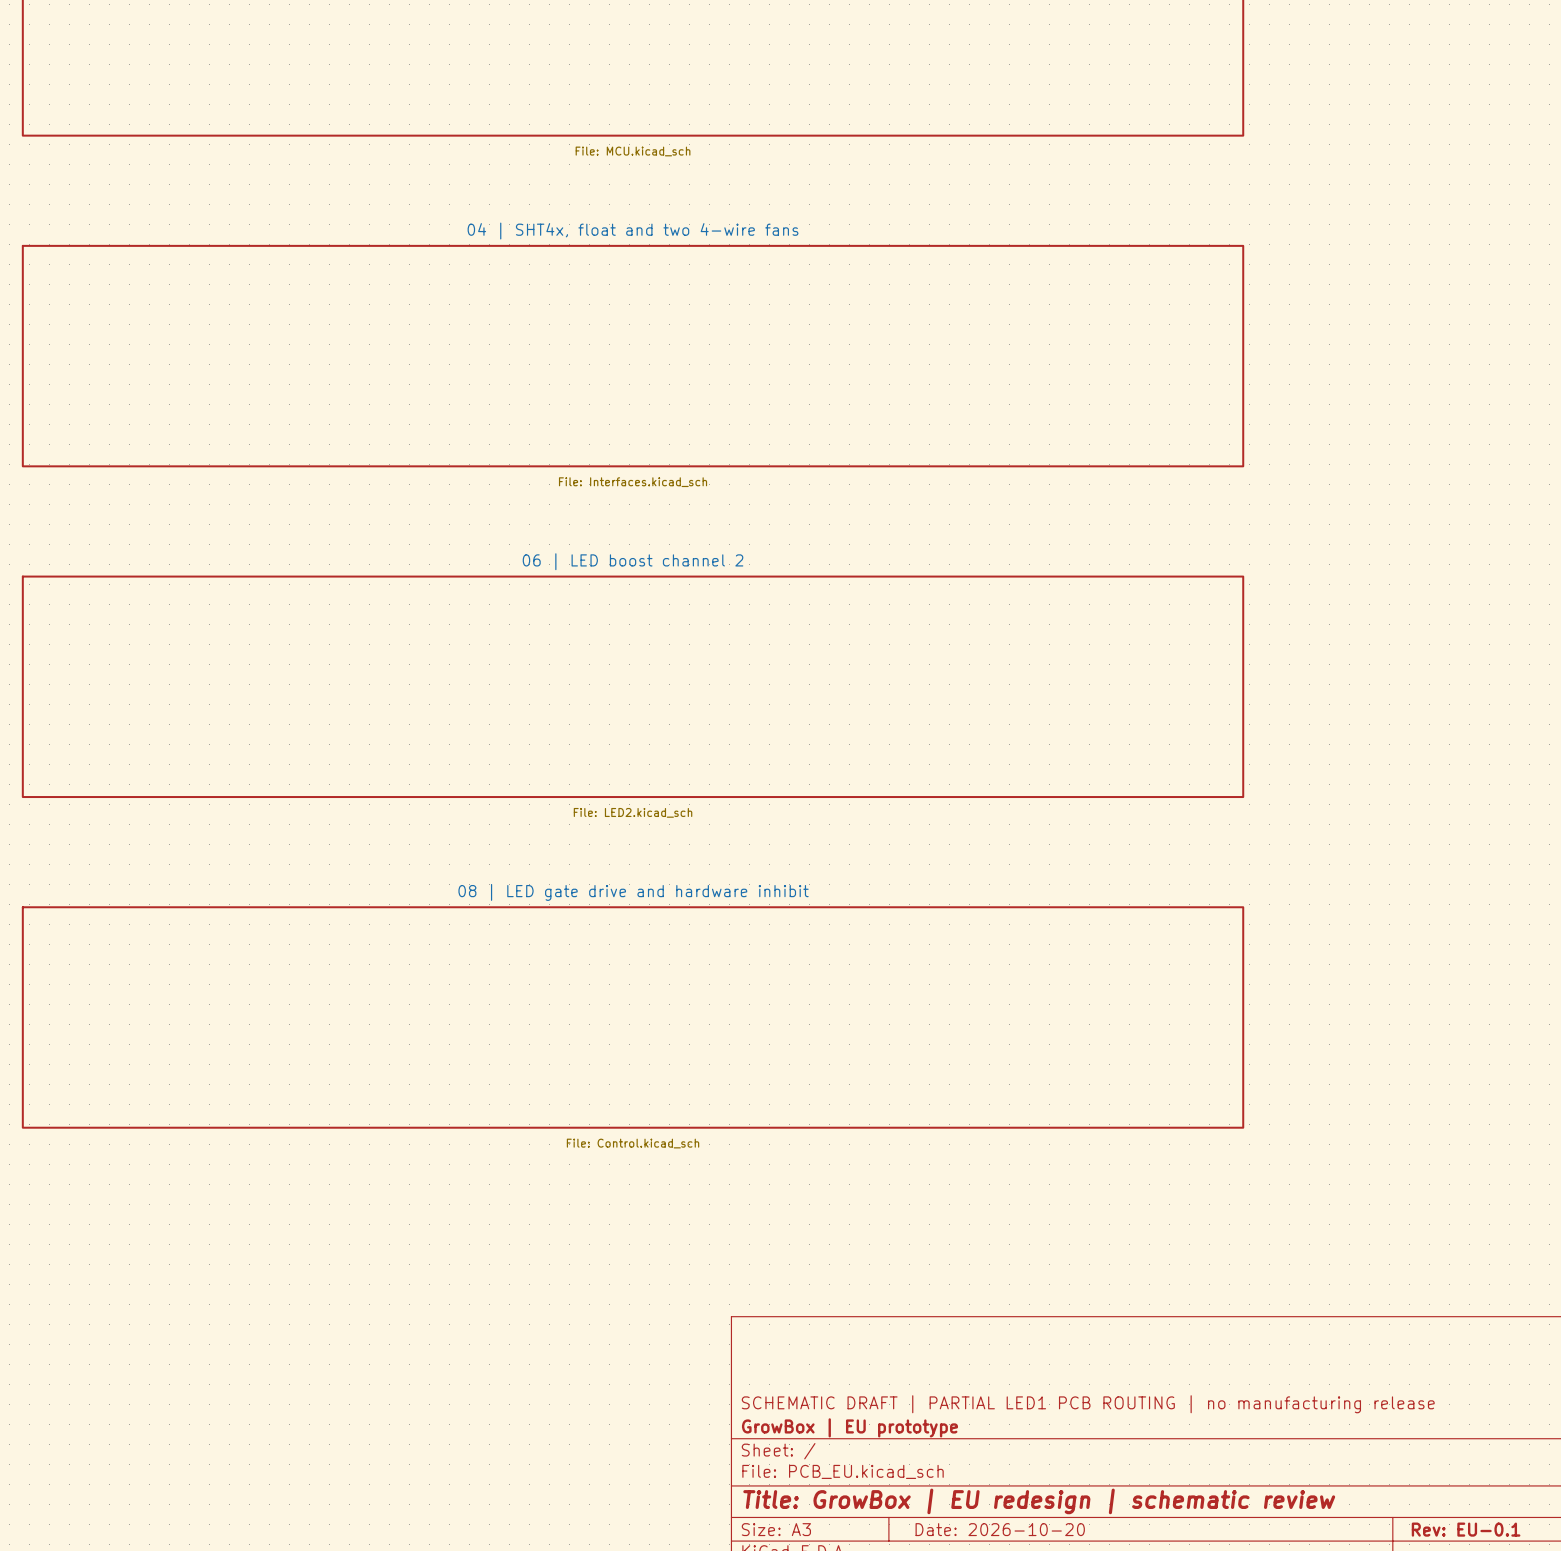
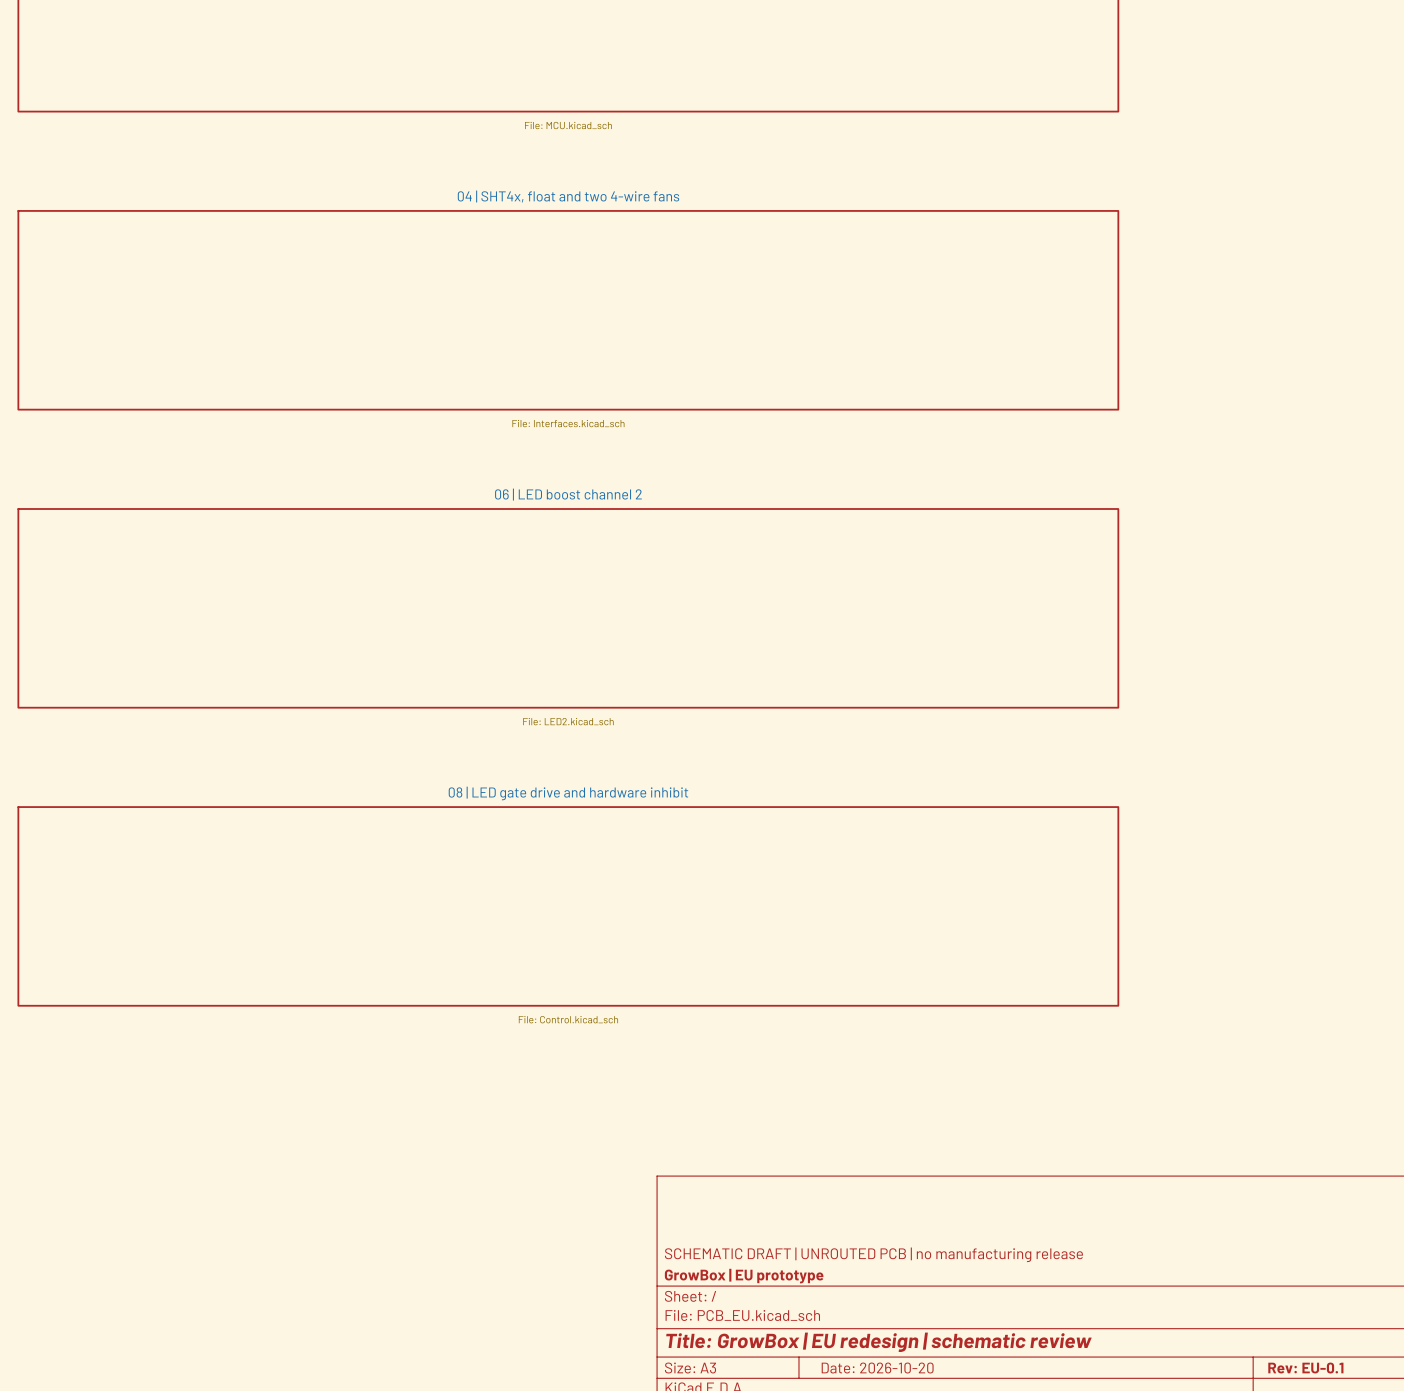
title block: SCHEMATIC DRAFT | PARTIAL LED1 PCB ROUTING | no manufacturing release (1088, 1404) -> SCHEMATIC DRAFT | UNROUTED PCB | no manufacturing release (873, 1254)

